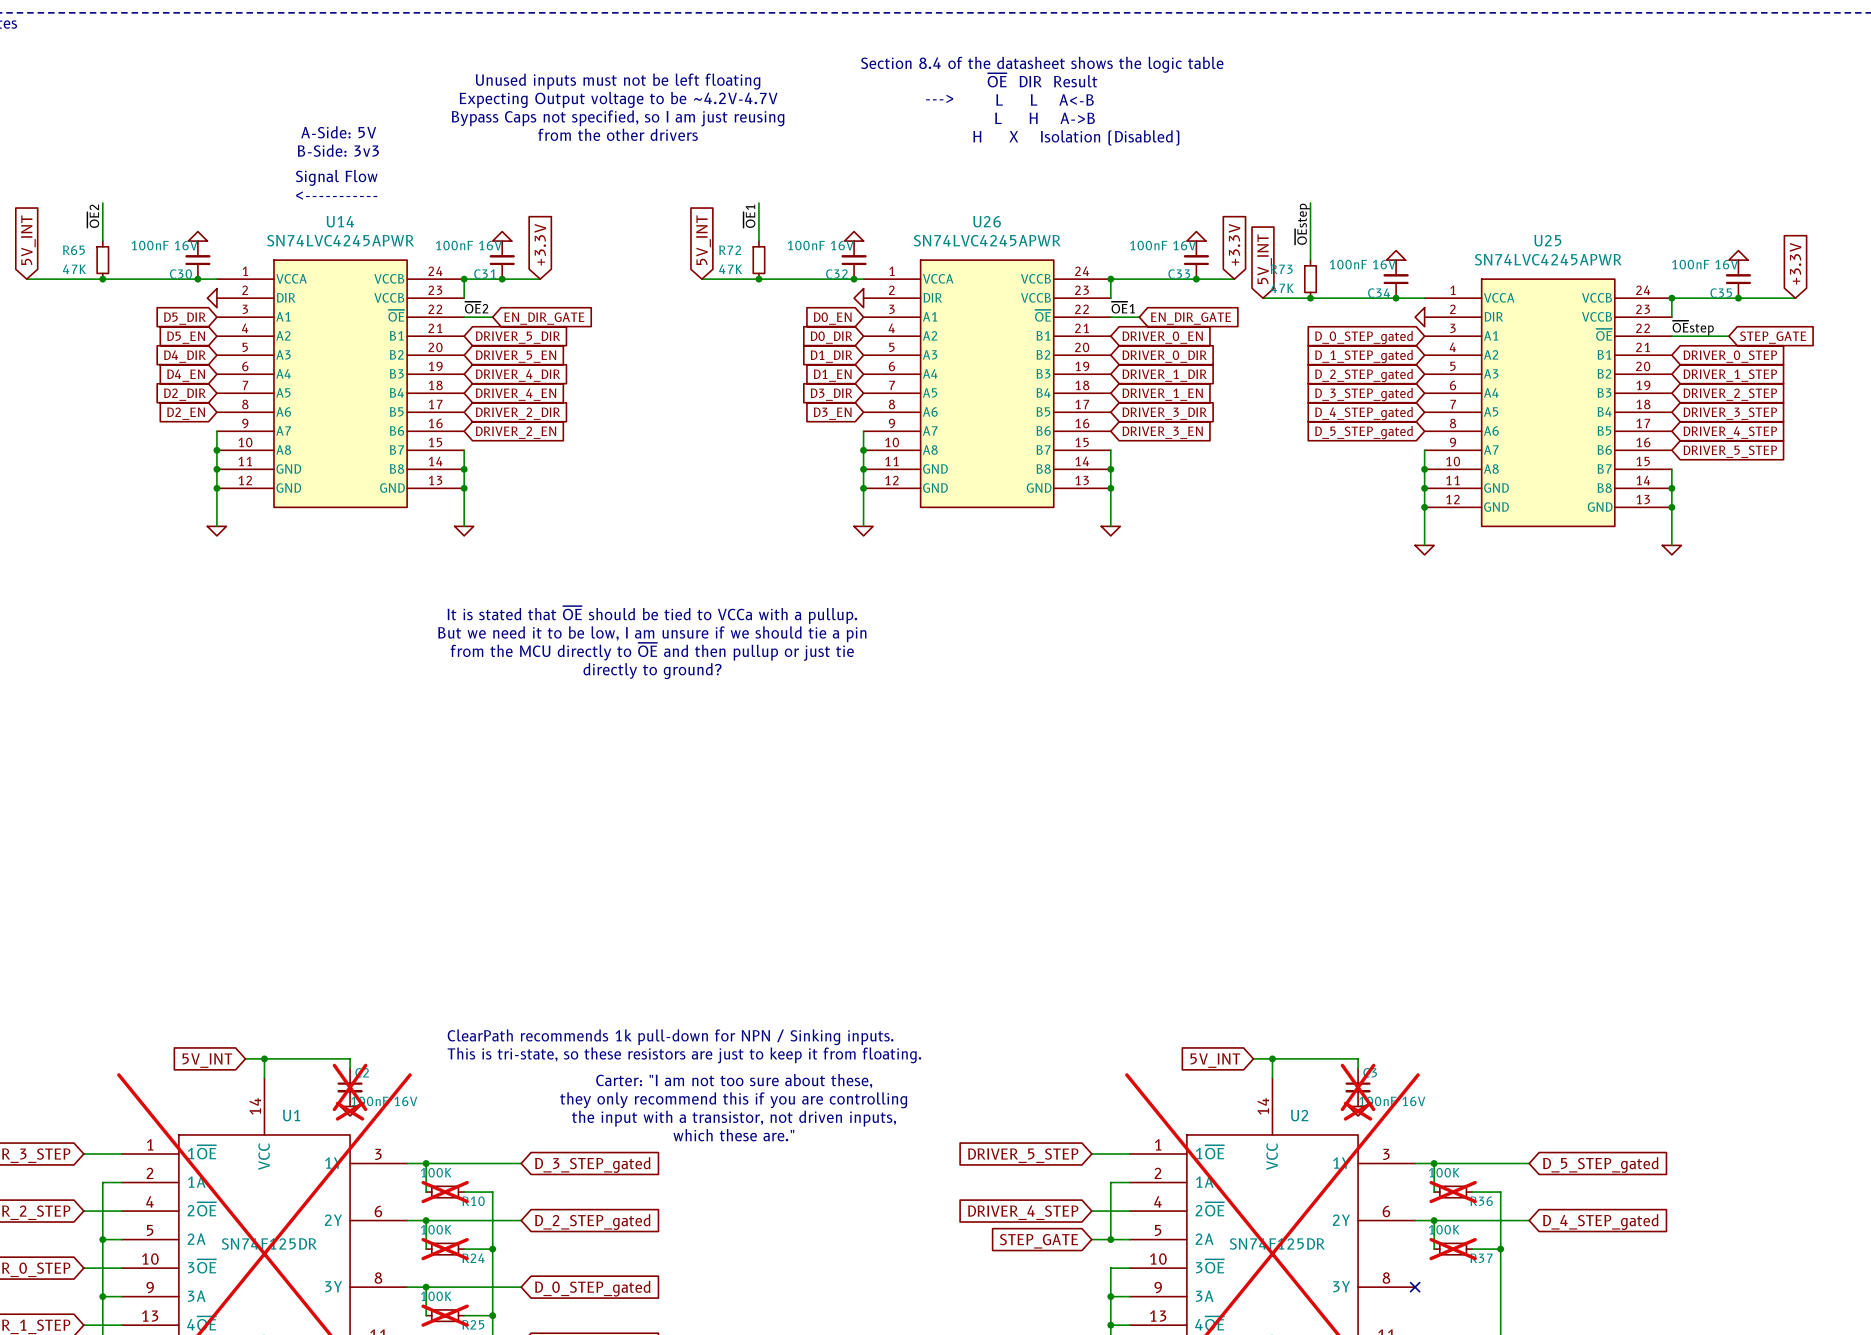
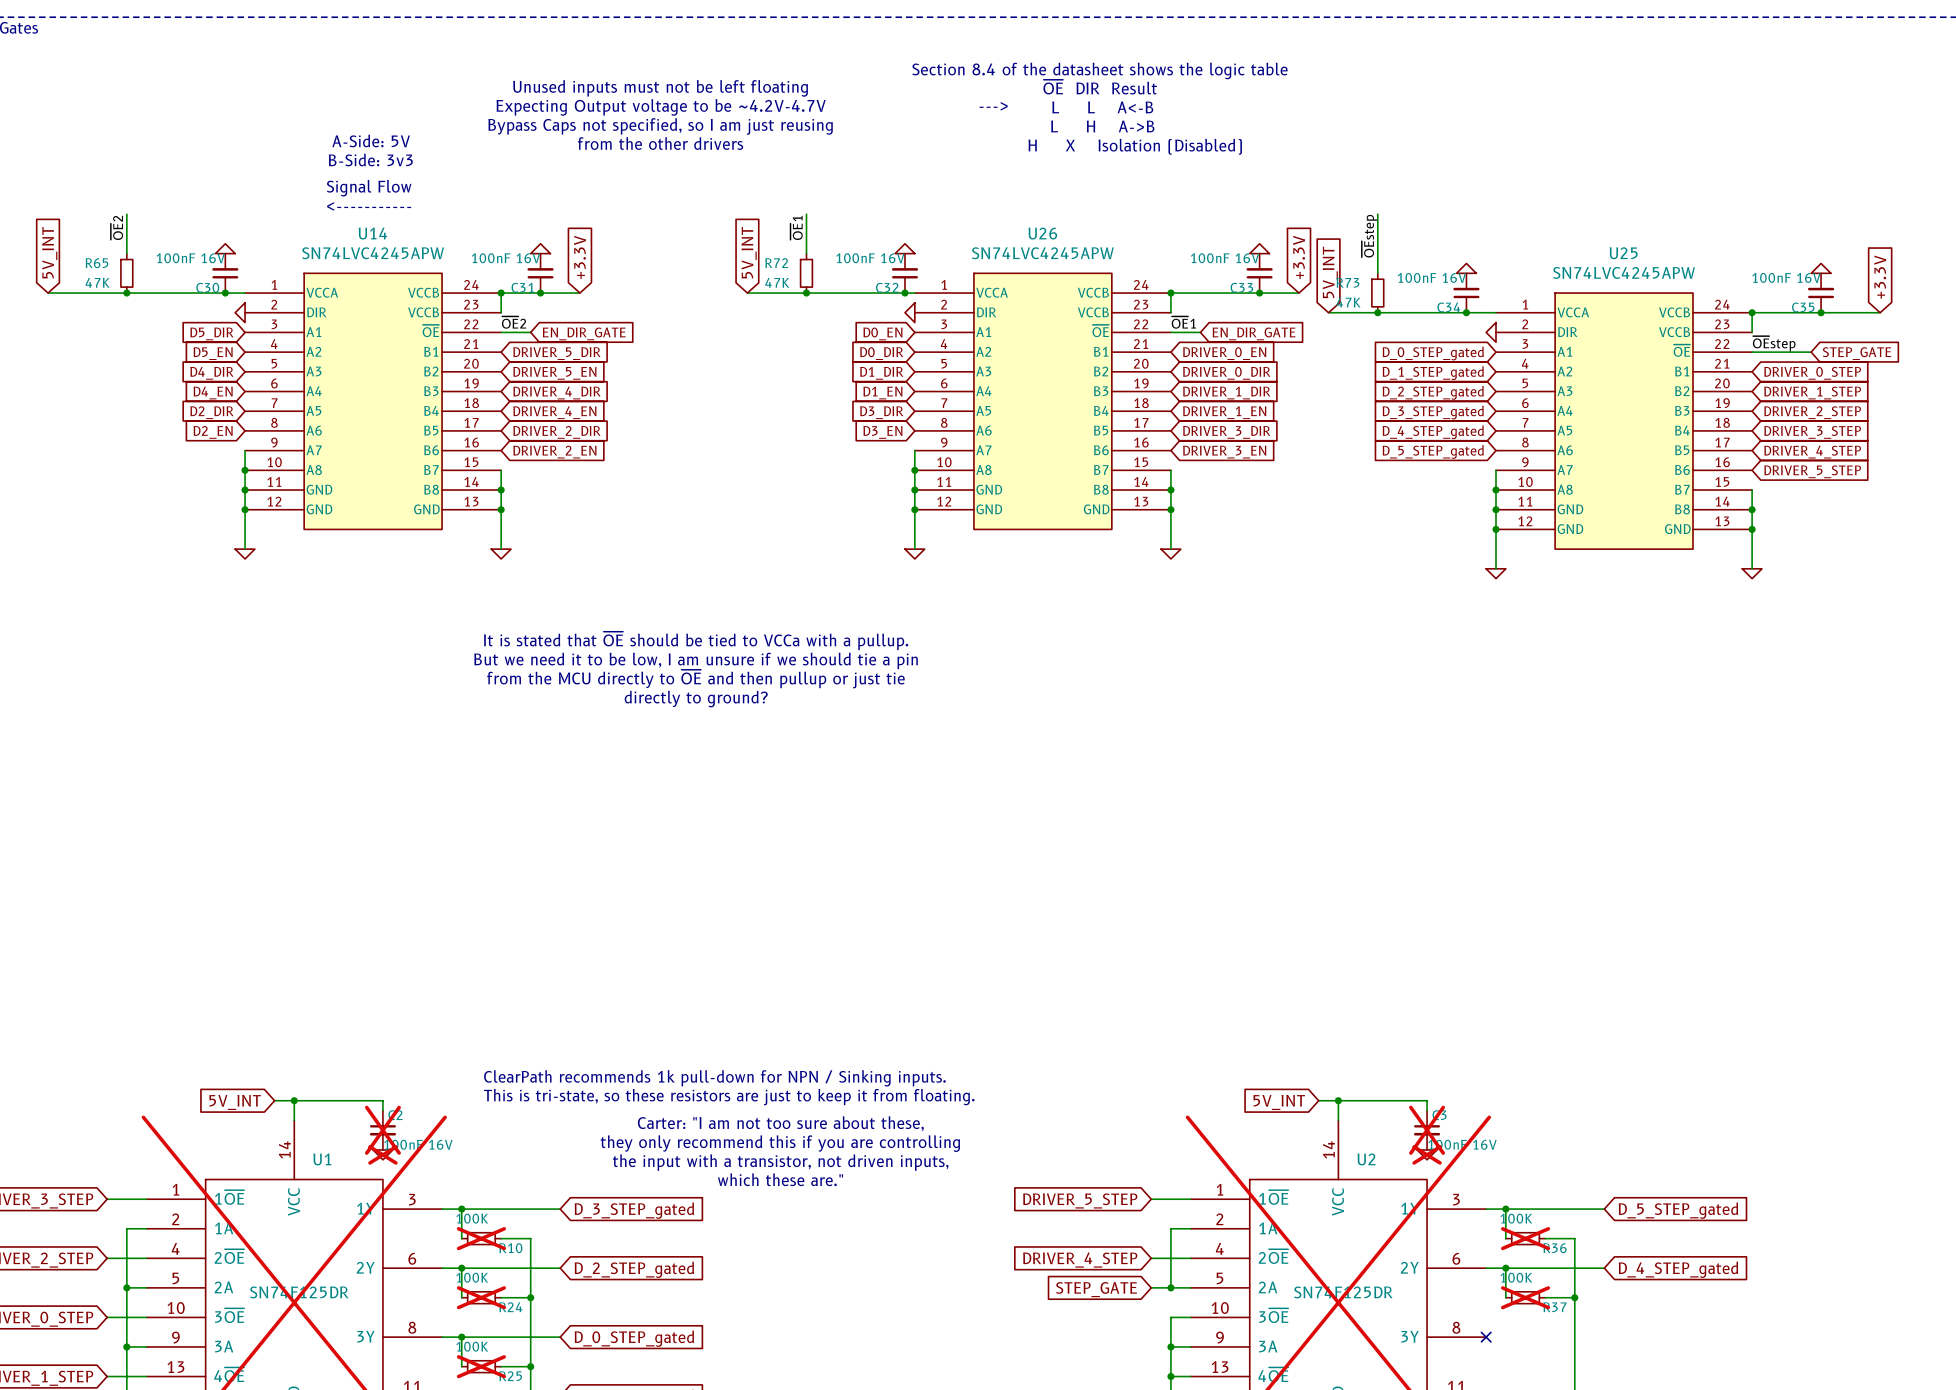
U14 value: SN74LVC4245APWR (340, 240) -> SN74LVC4245APW (373, 253)
U26 value: SN74LVC4245APWR (987, 240) -> SN74LVC4245APW (1042, 253)
U25 value: SN74LVC4245APWR (1548, 259) -> SN74LVC4245APW (1624, 272)

